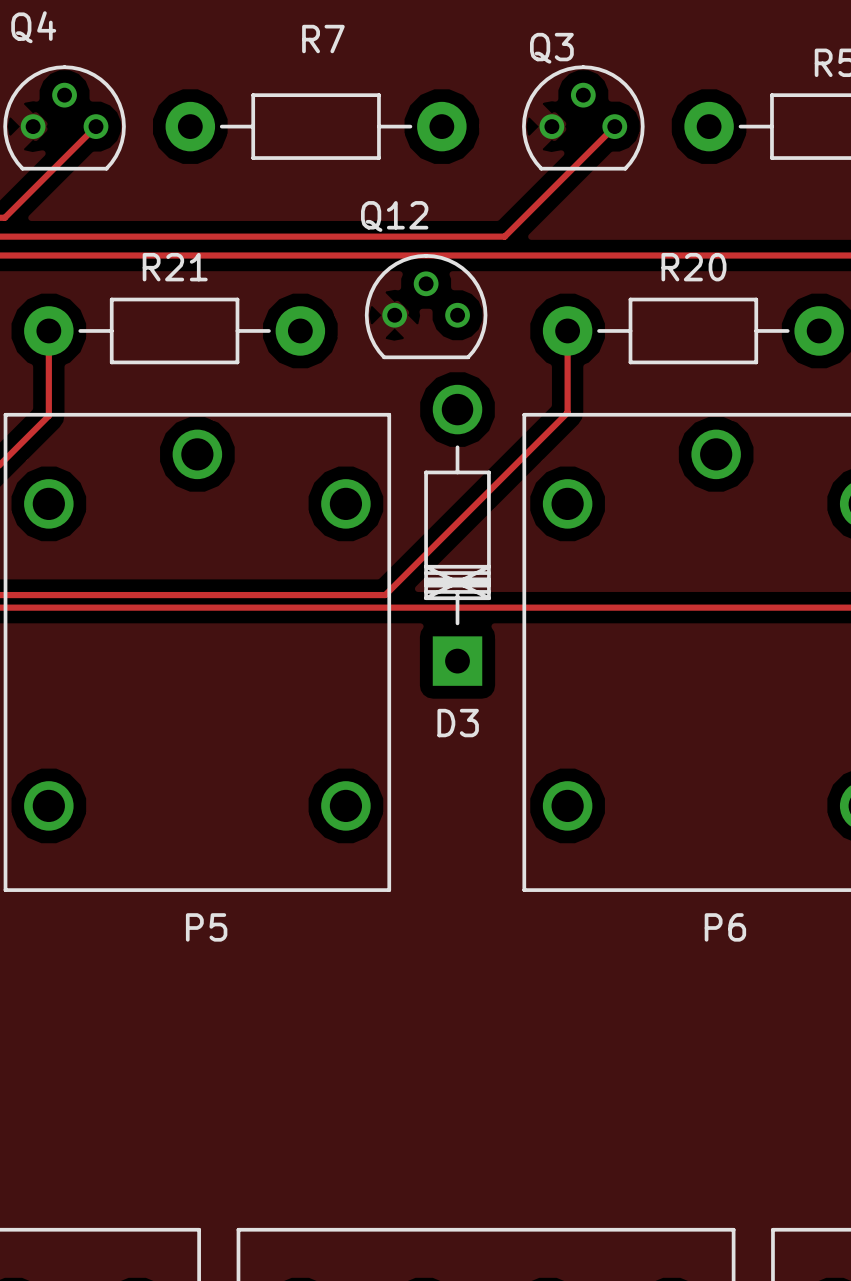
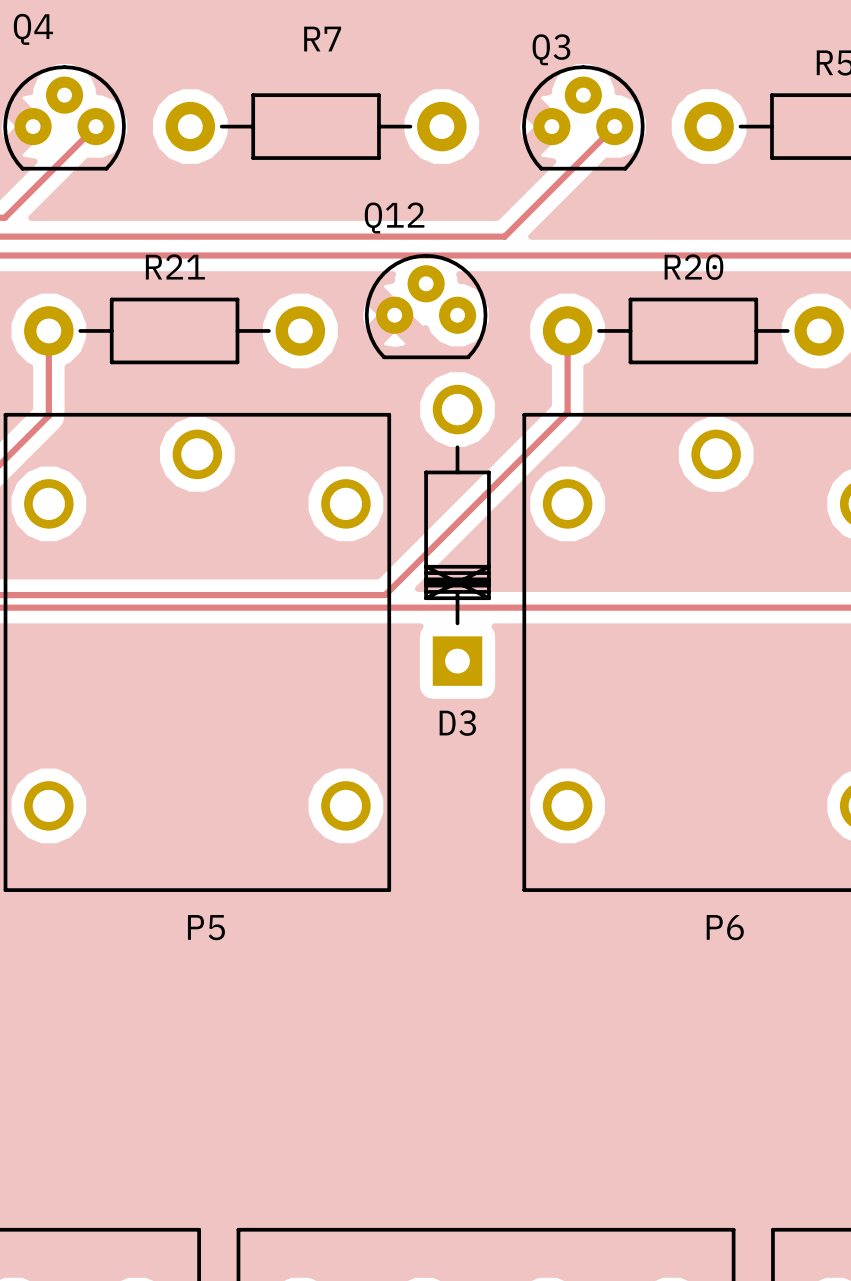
Q4 footprint: [3, 65, 126, 171] -> [3, 65, 126, 171]
Q3 footprint: [522, 65, 645, 171] -> [522, 65, 645, 171]
Q12 footprint: [364, 253, 488, 360] -> [364, 253, 488, 360]

